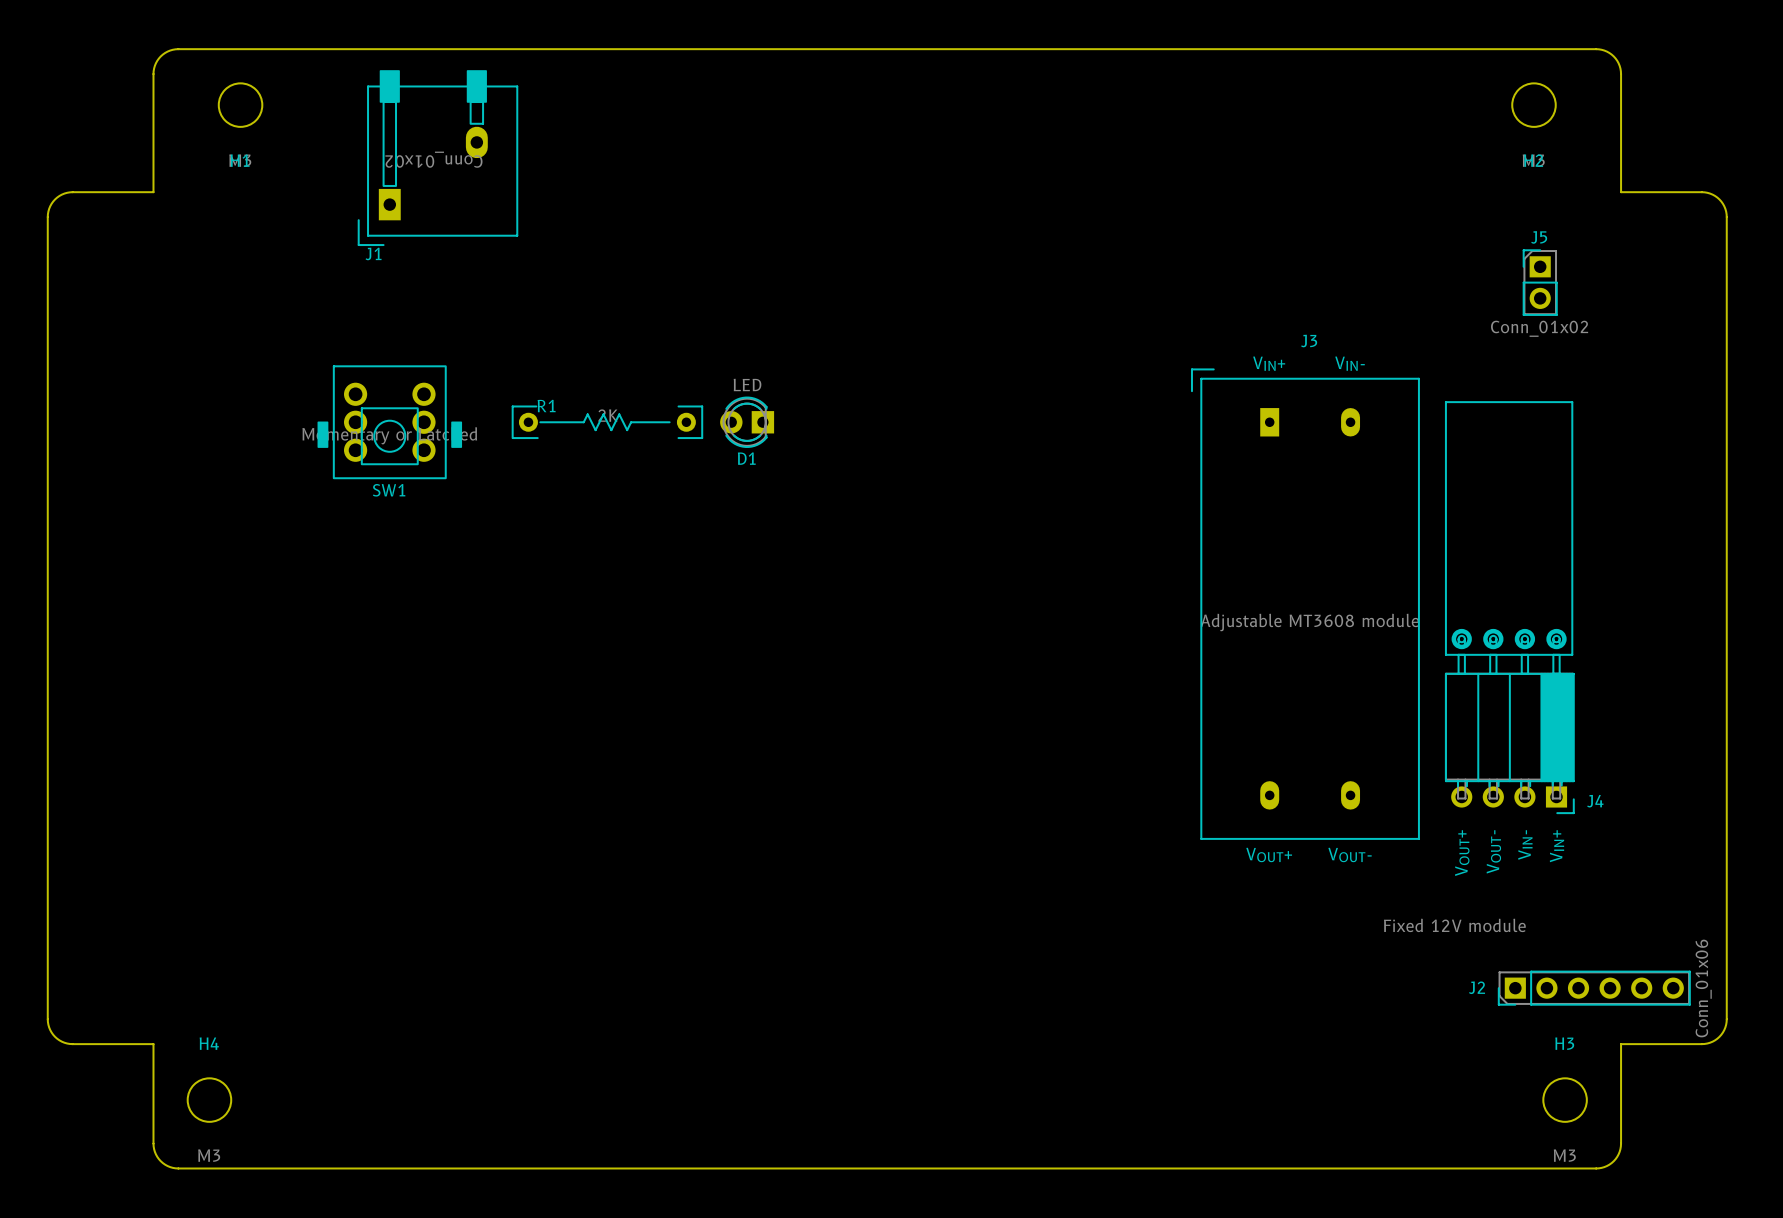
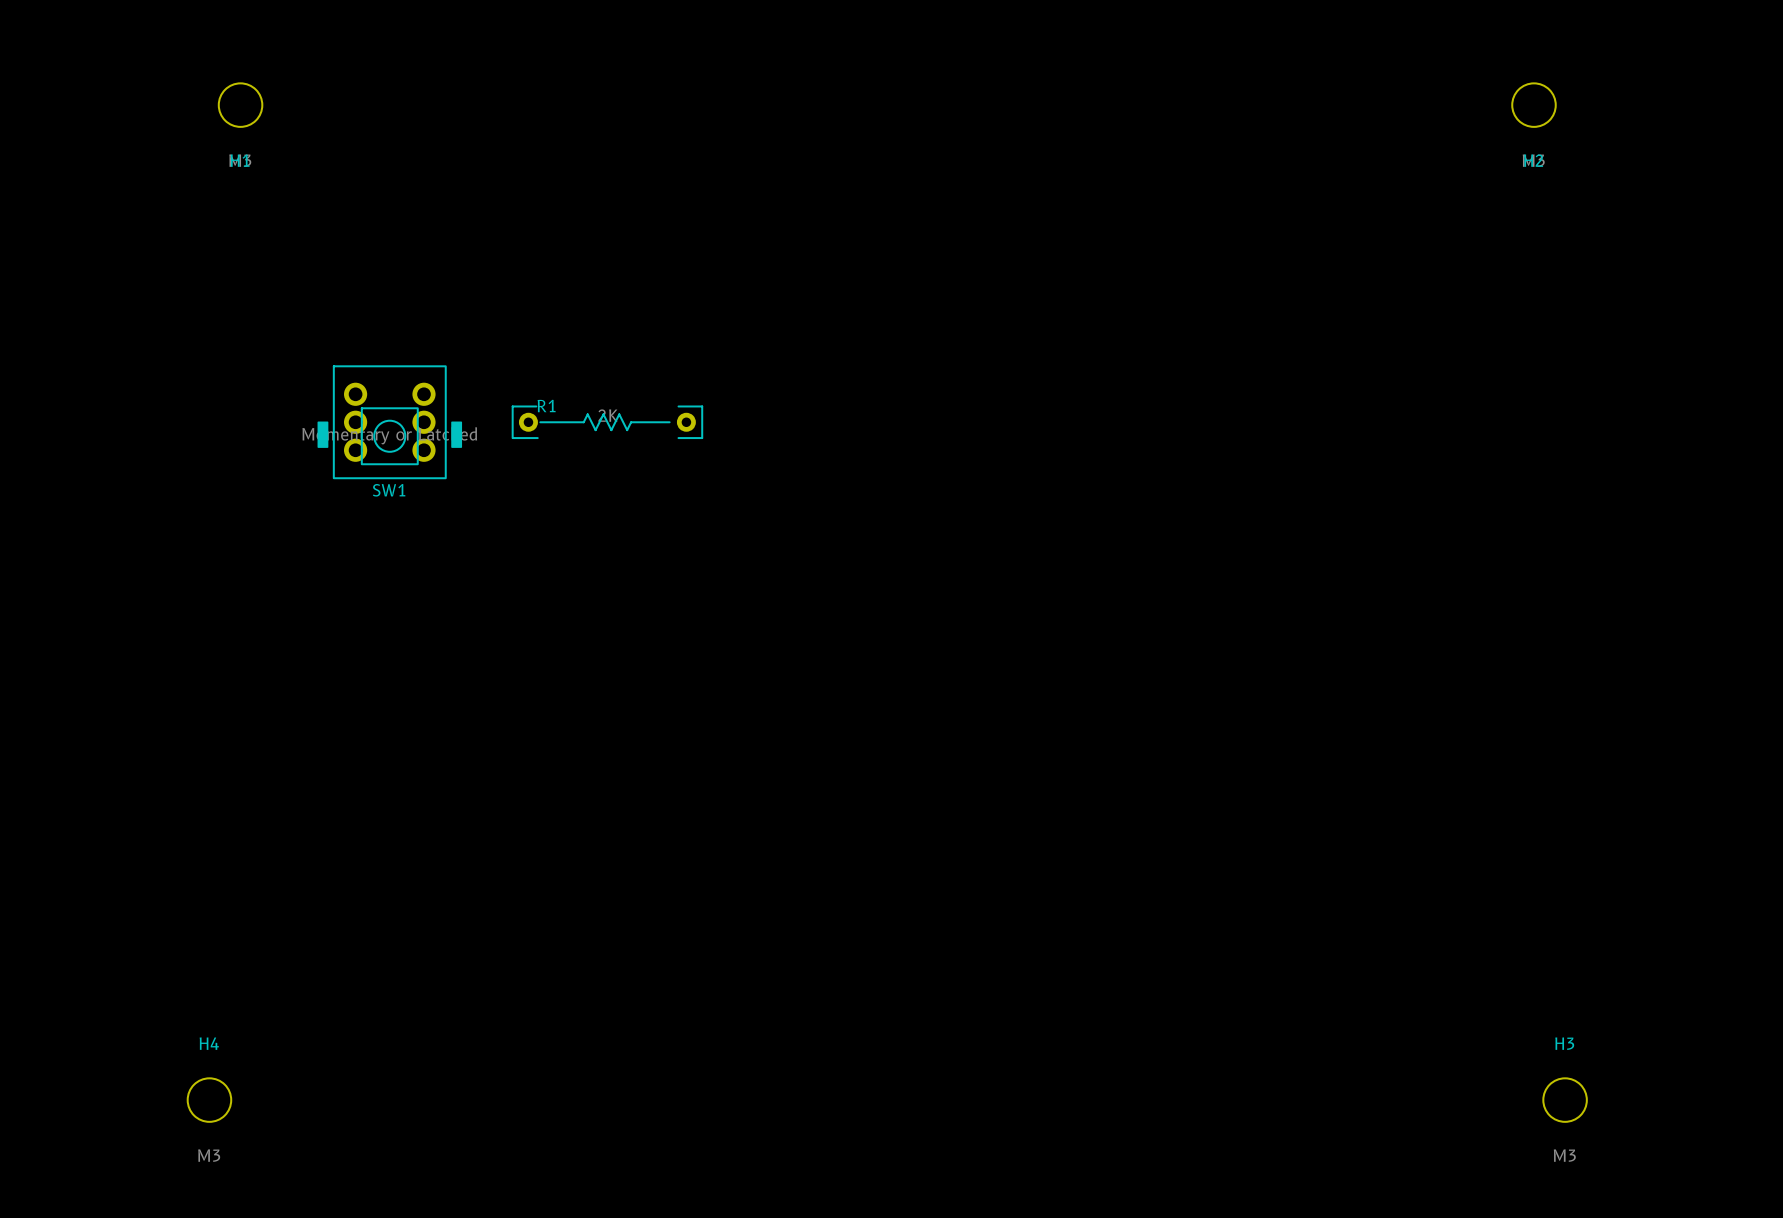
board edge: (178, 49) (1596, 49) (1609, 52) (1617, 60) (1620, 71) (1621, 192) (1707, 192) (1719, 199) (1726, 214) (1726, 1019) (1722, 1032) (1715, 1040) (1704, 1043) (1621, 1044) (1620, 1149) (1611, 1163) (1598, 1168) (178, 1168) (165, 1164) (157, 1156) (153, 1146) (153, 1044) (67, 1043) (55, 1036) (47, 1022) (47, 217) (53, 201) (67, 192) (153, 192) (154, 68) (162, 54) (178, 49) -> none
J1: Conn_01x02 (437, 157) -> none
J5: Conn_01x02 (1540, 282) -> none
D1: LED (747, 422) -> none
J3: Adjustable MT3608 module (1305, 604) -> none
J4: Fixed 12V module (1509, 607) -> none
J2: Conn_01x06 (1594, 988) -> none

